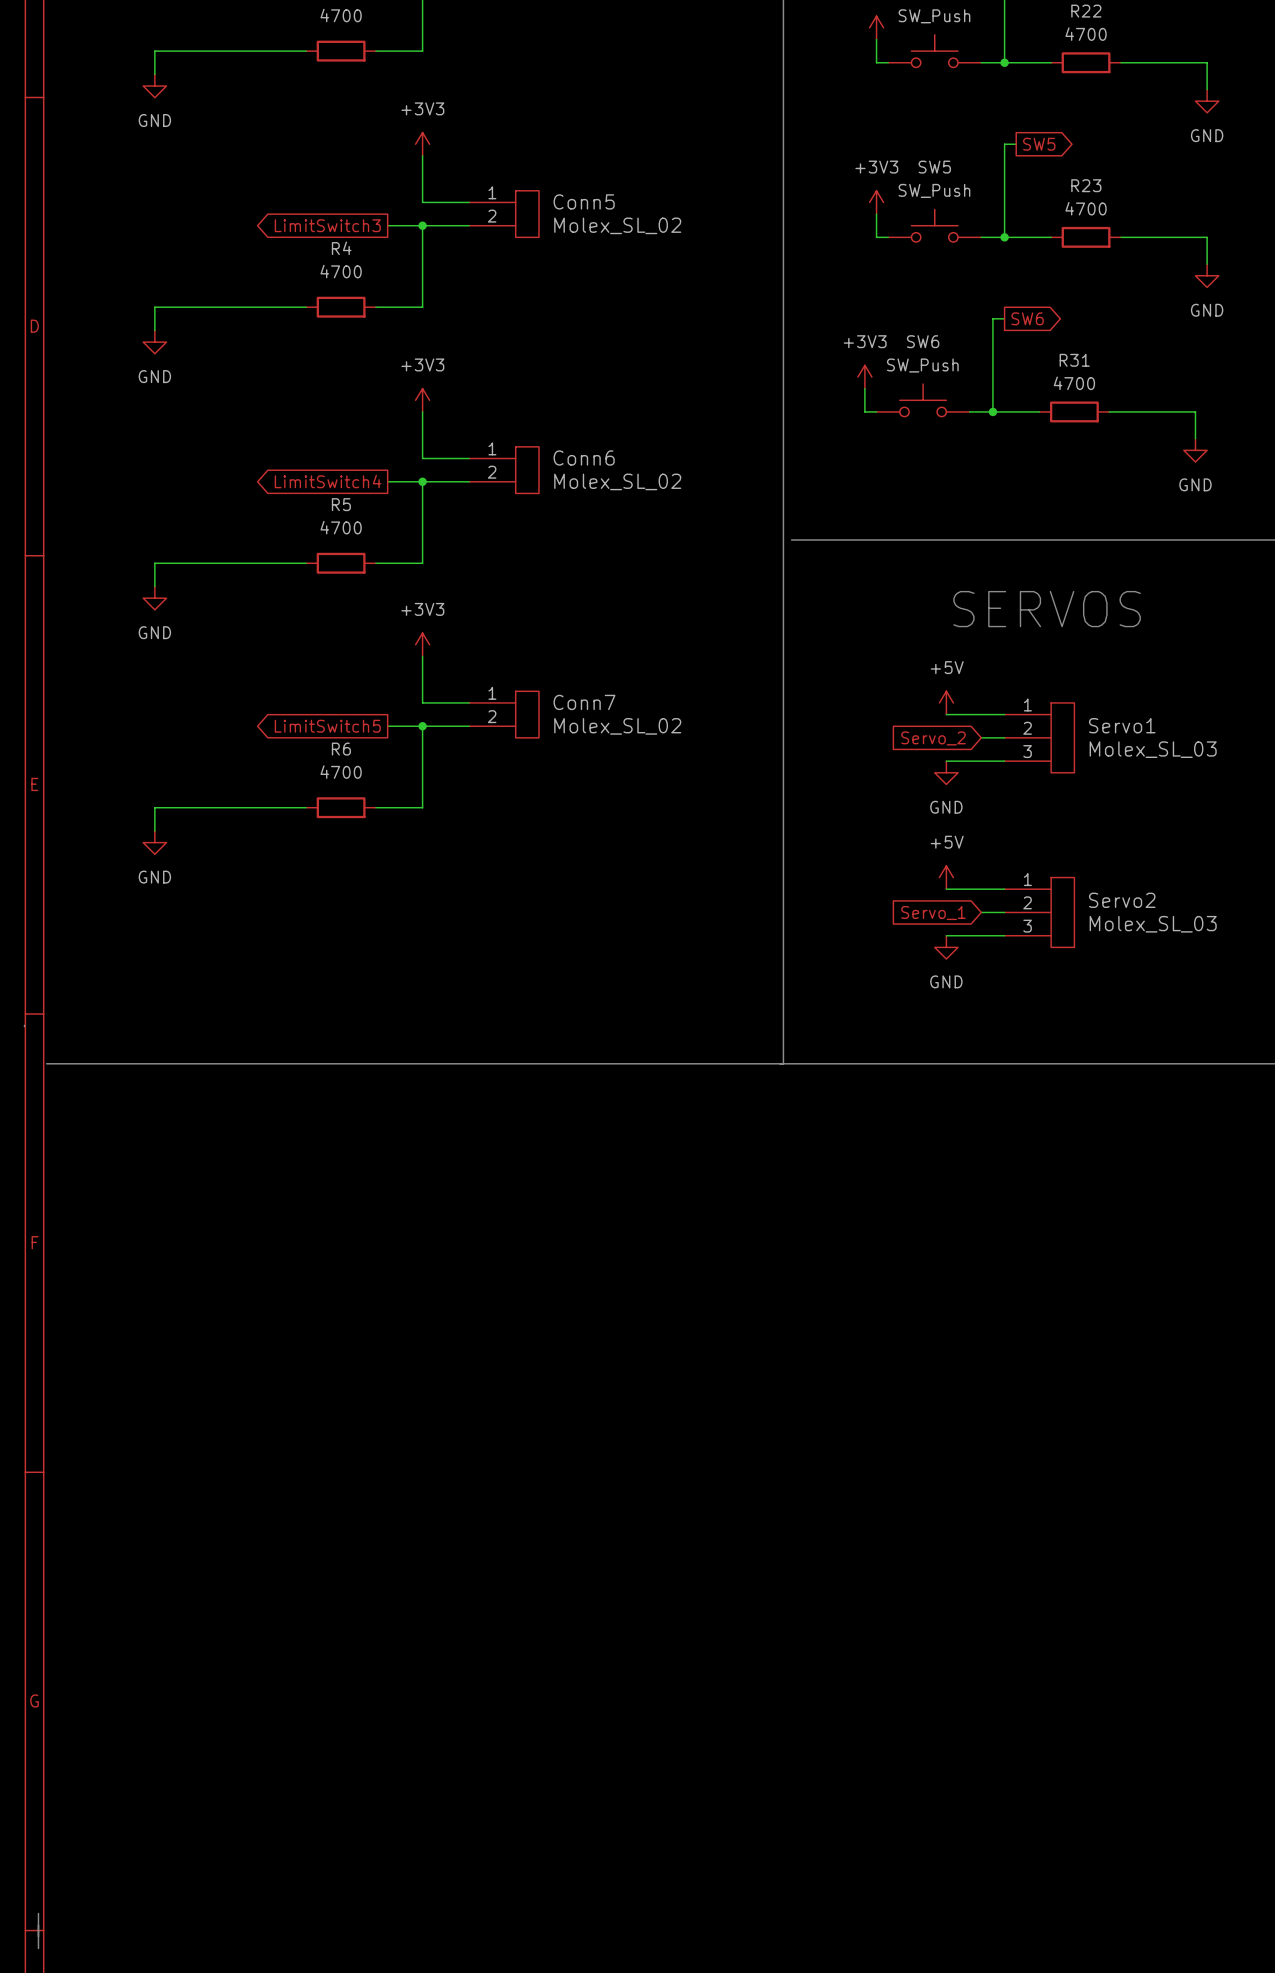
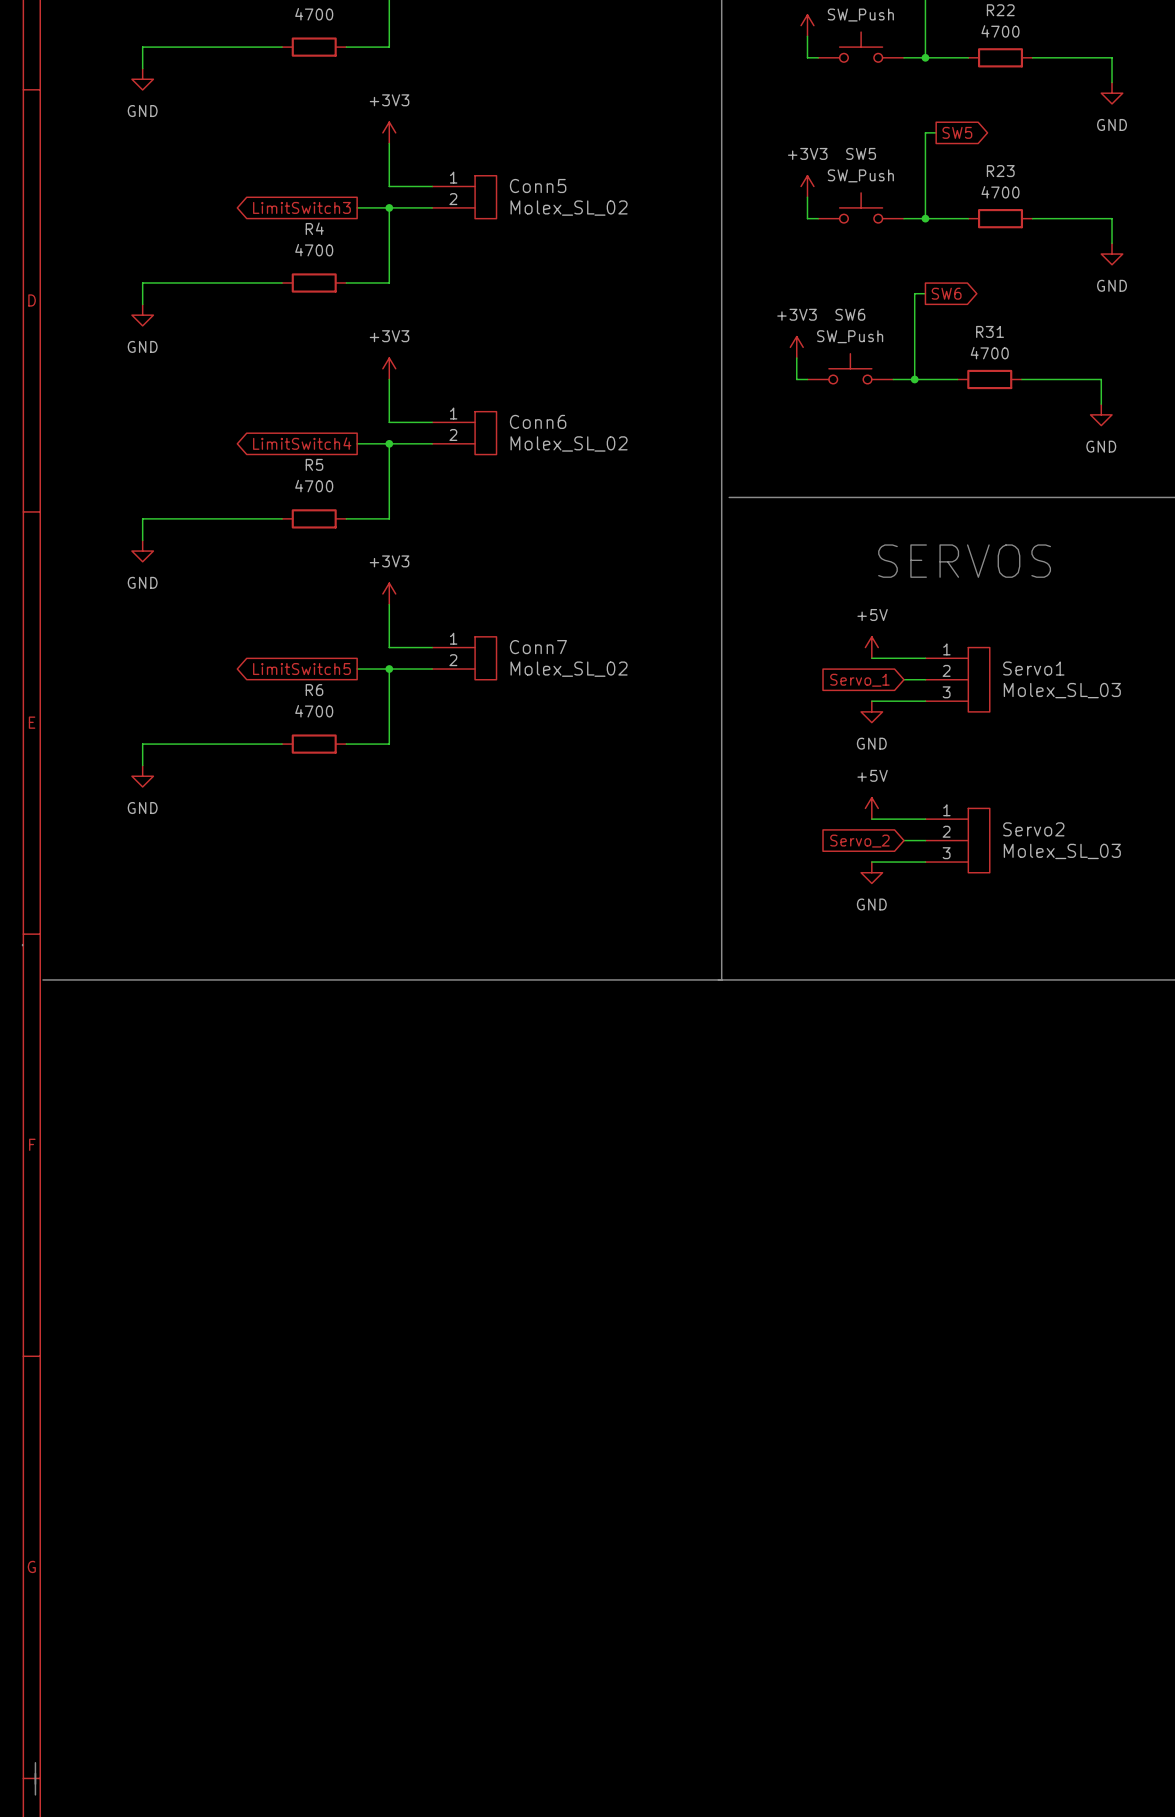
global label: Servo_2 (933, 738) -> Servo_1 (859, 680)
global label: Servo_1 (933, 913) -> Servo_2 (859, 841)

